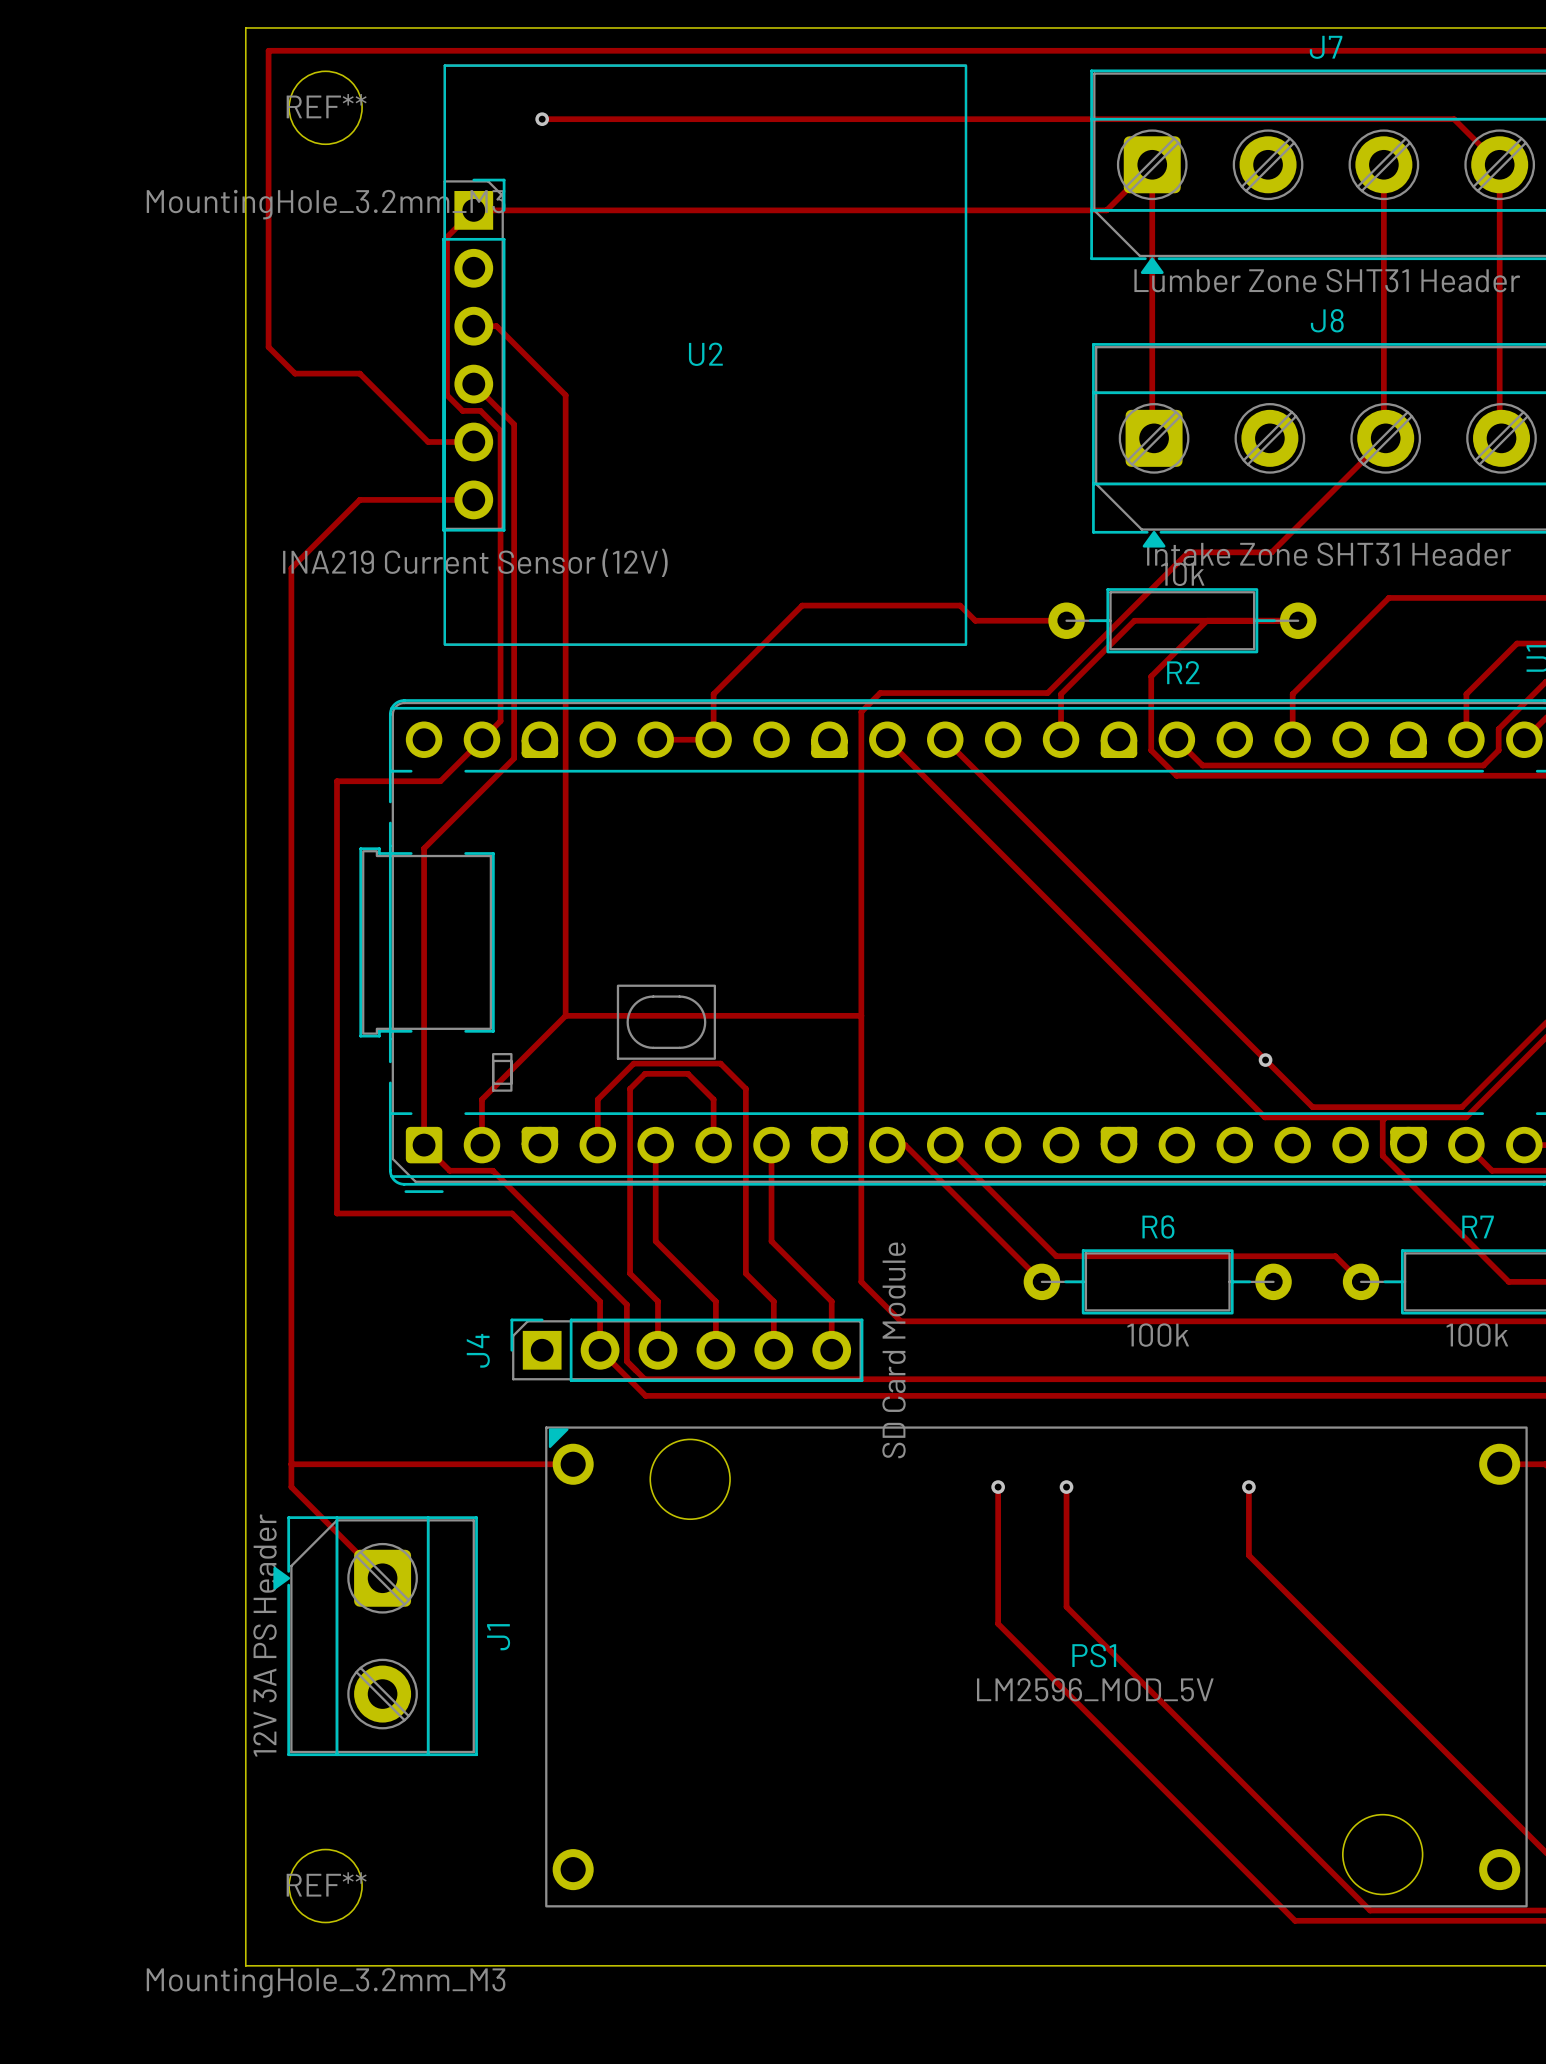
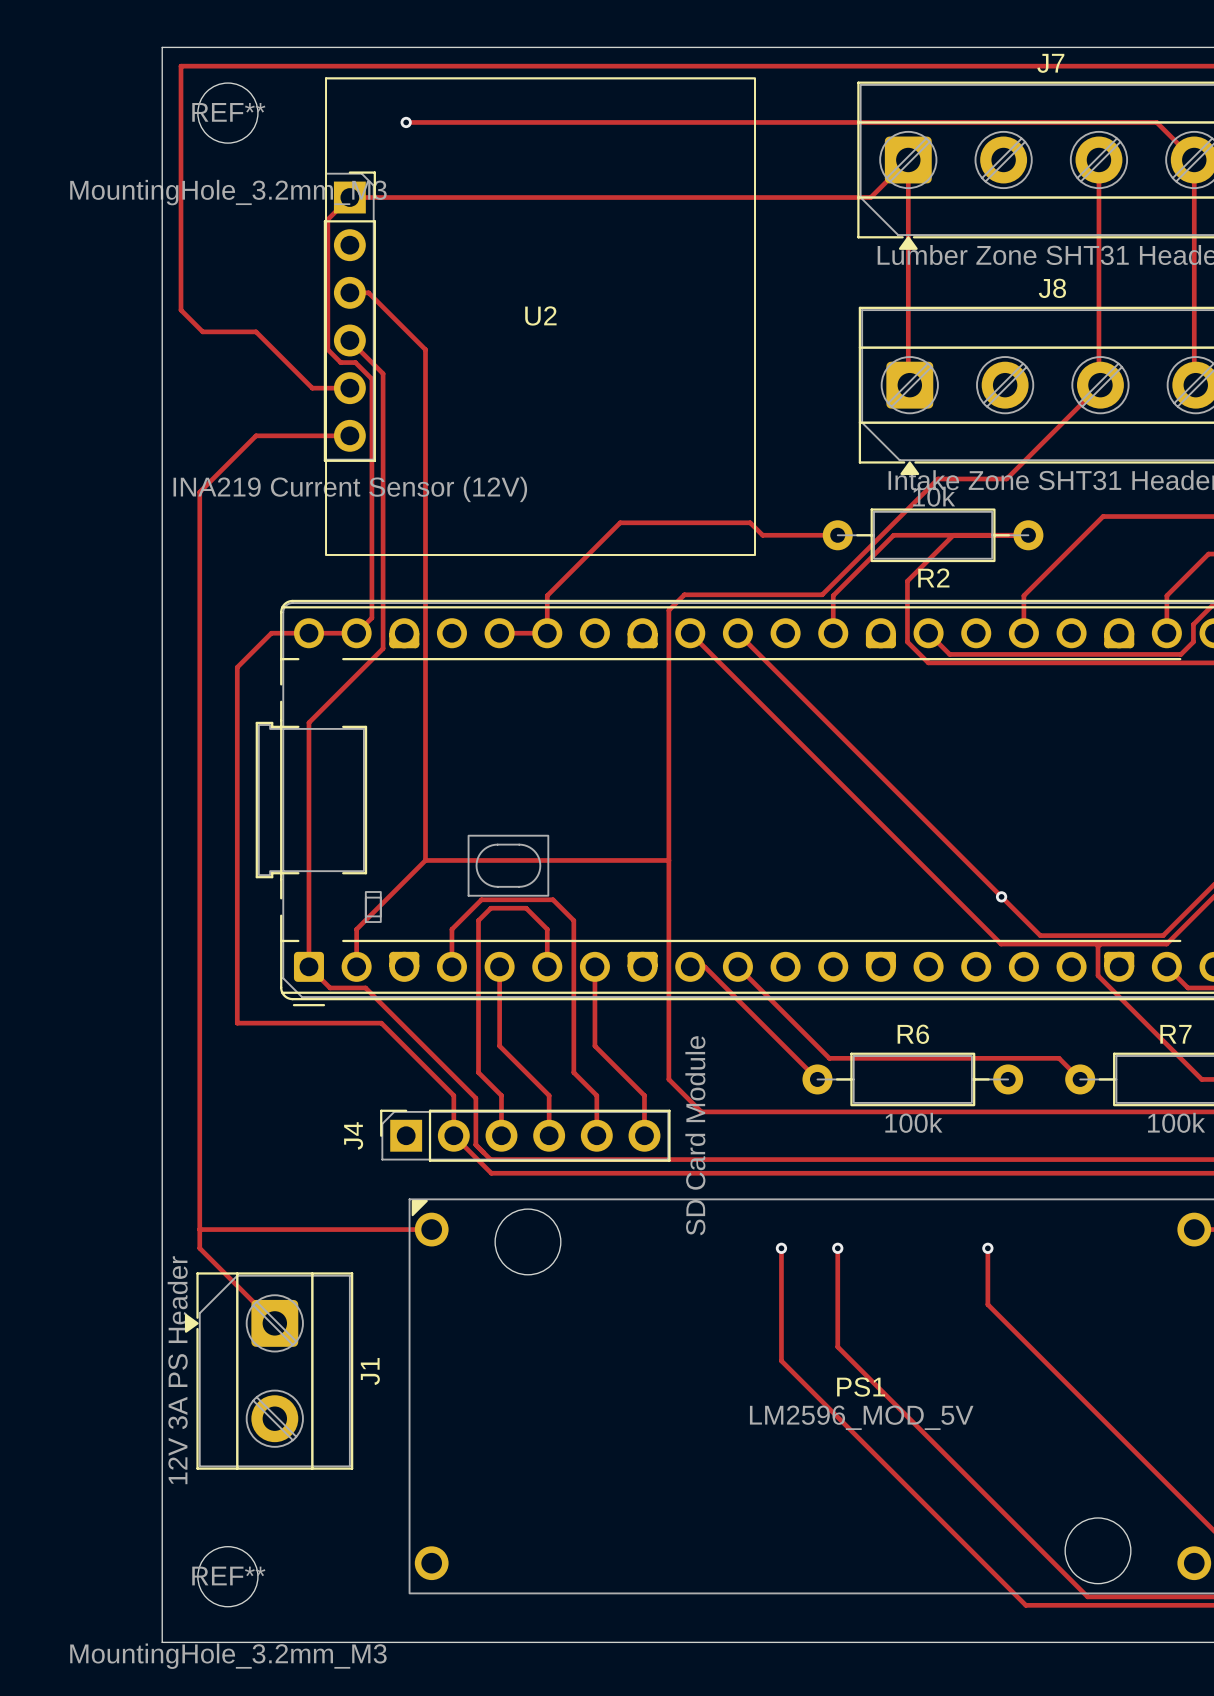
track: (481, 739) (440, 781) (336, 781) -> (356, 633) (271, 633) (237, 667)

